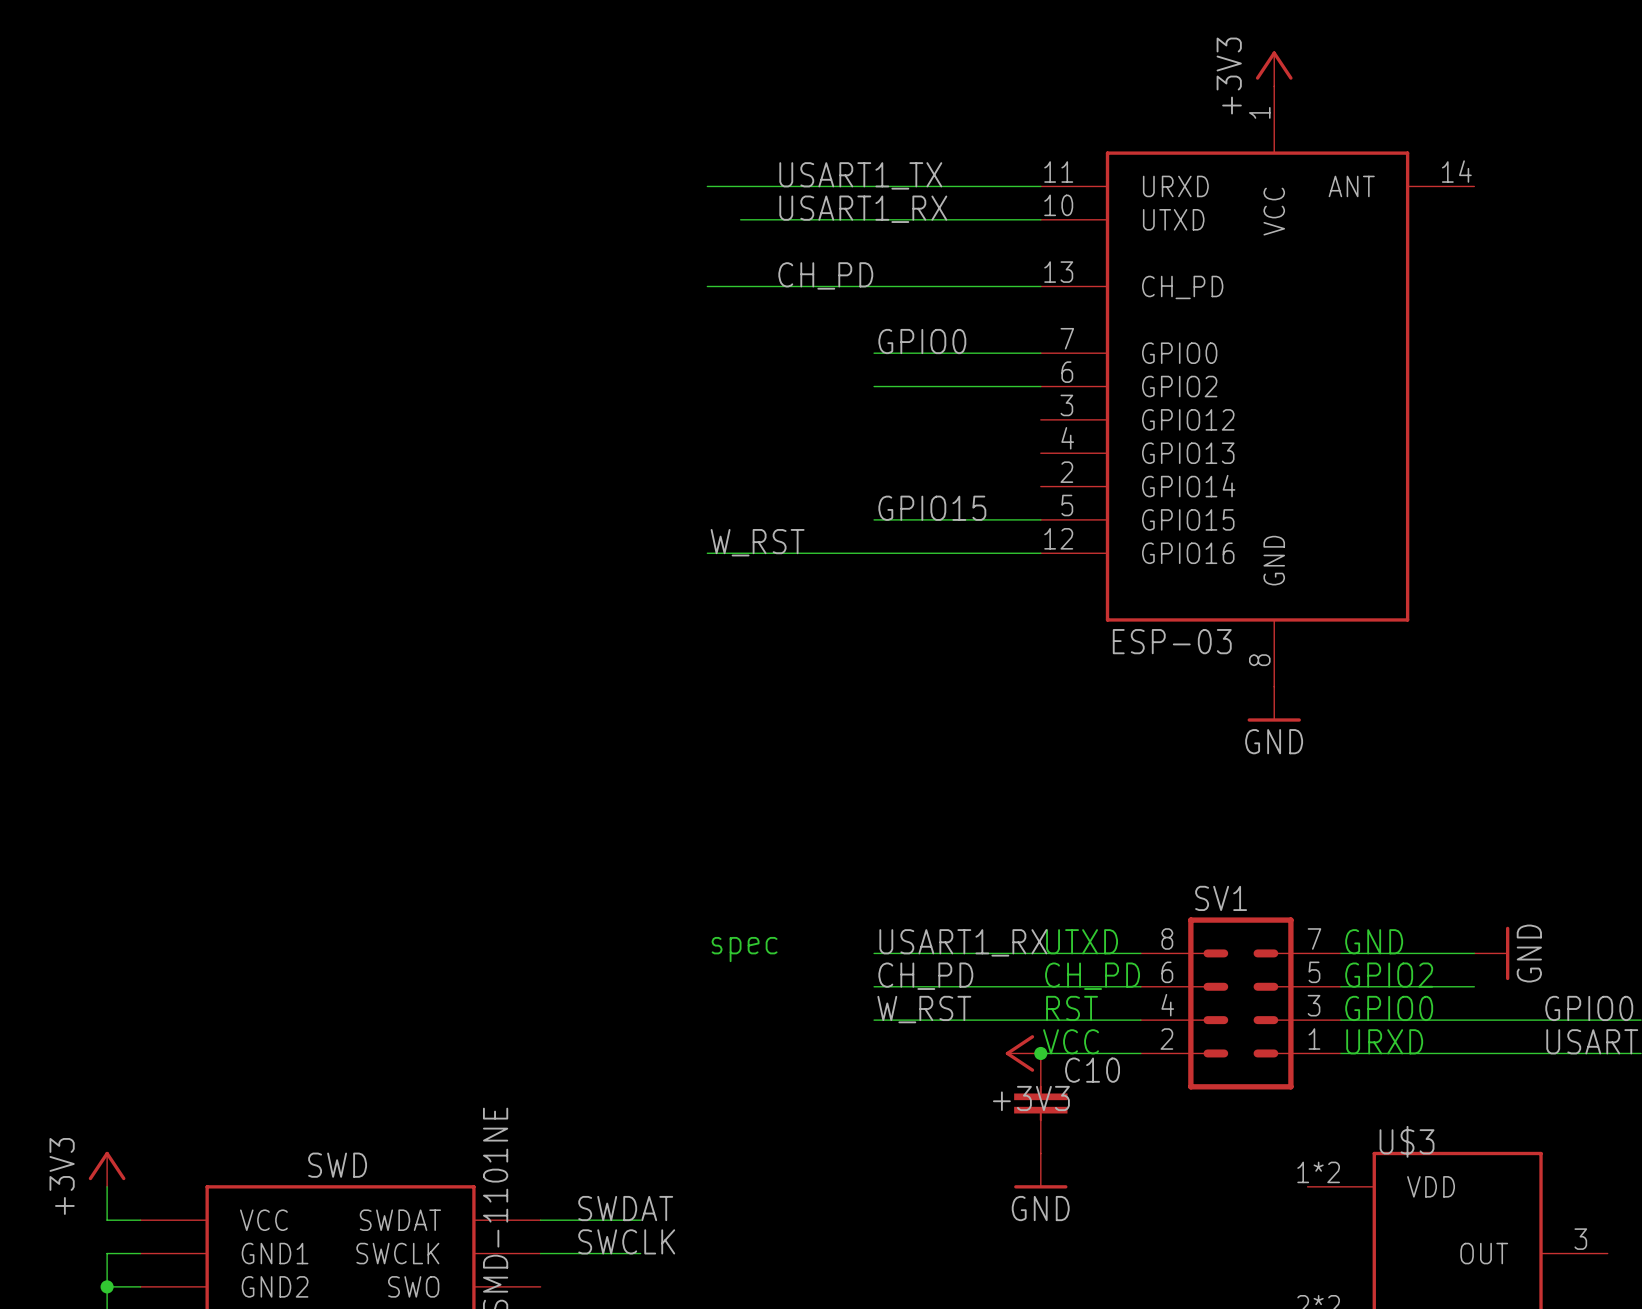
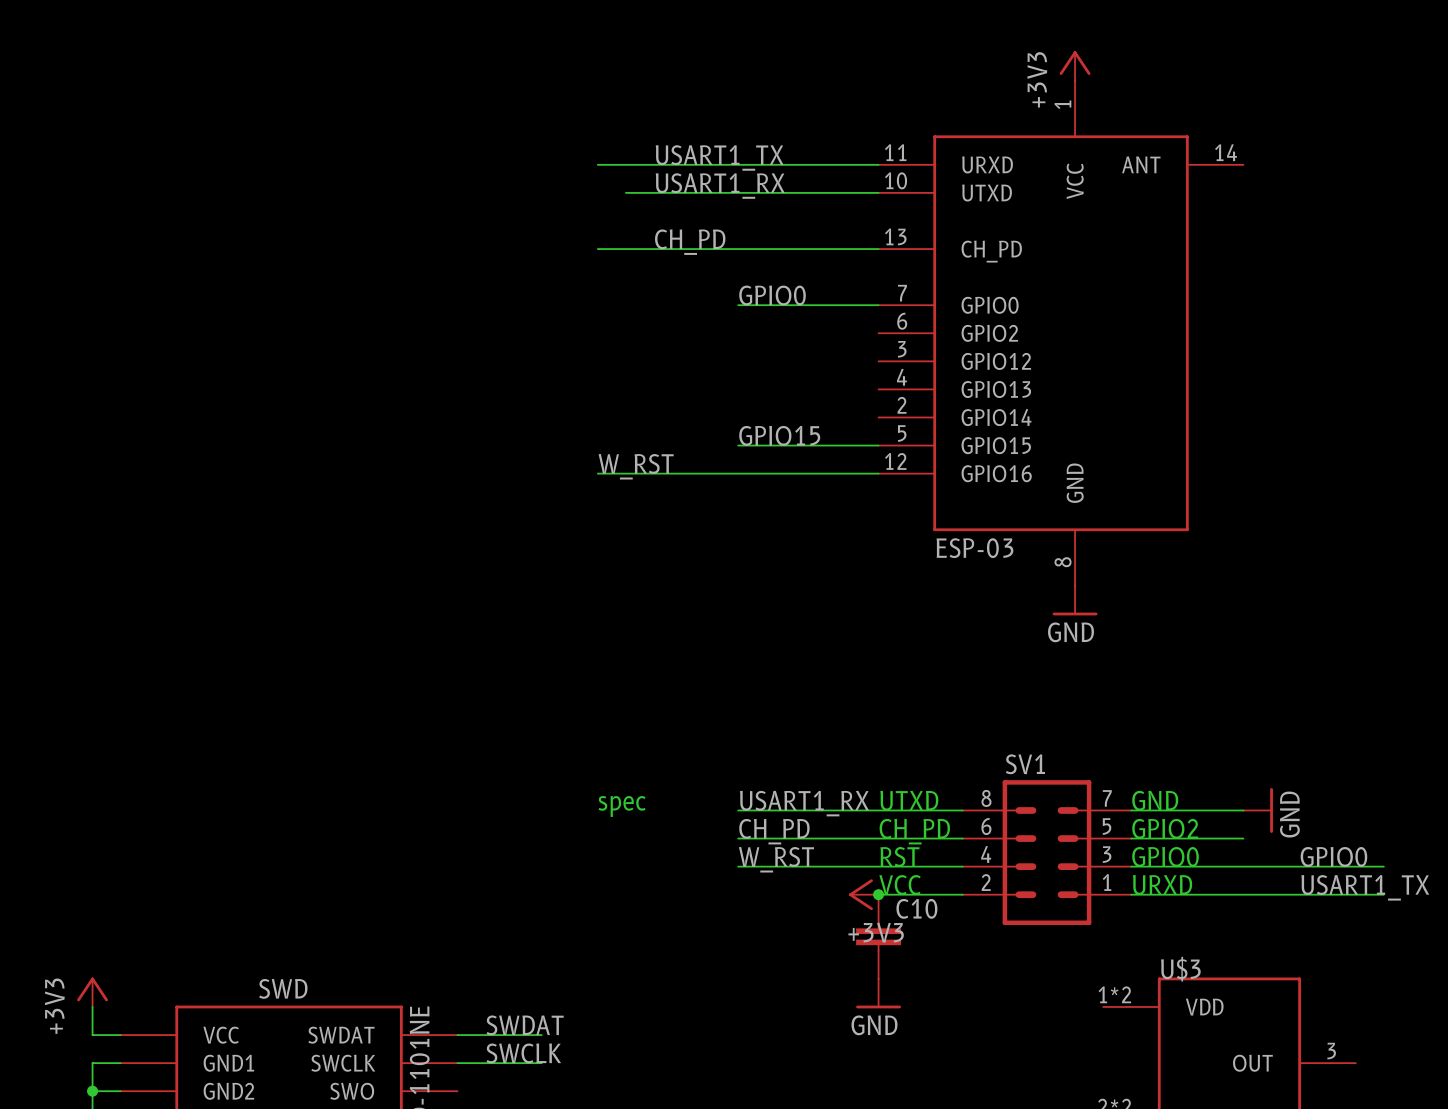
wire: (874, 386) (1040, 386) -> none

